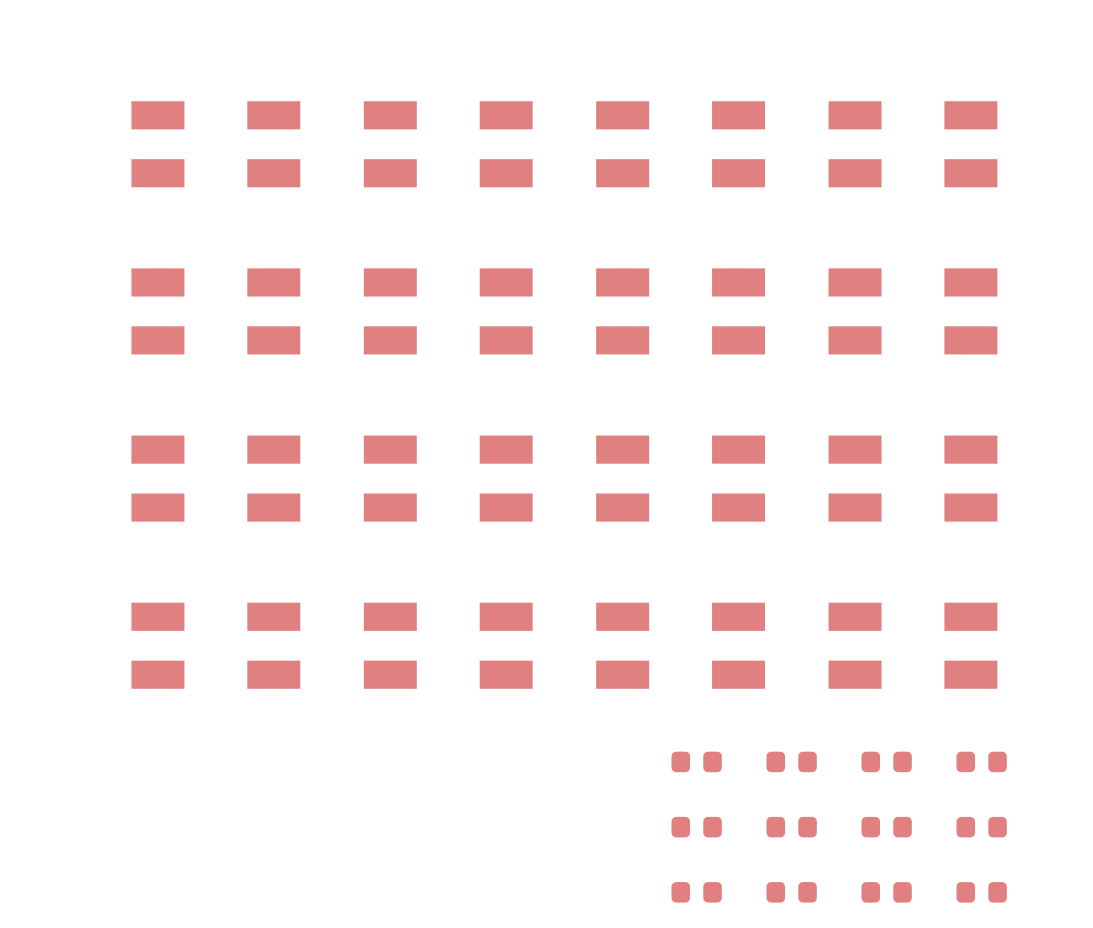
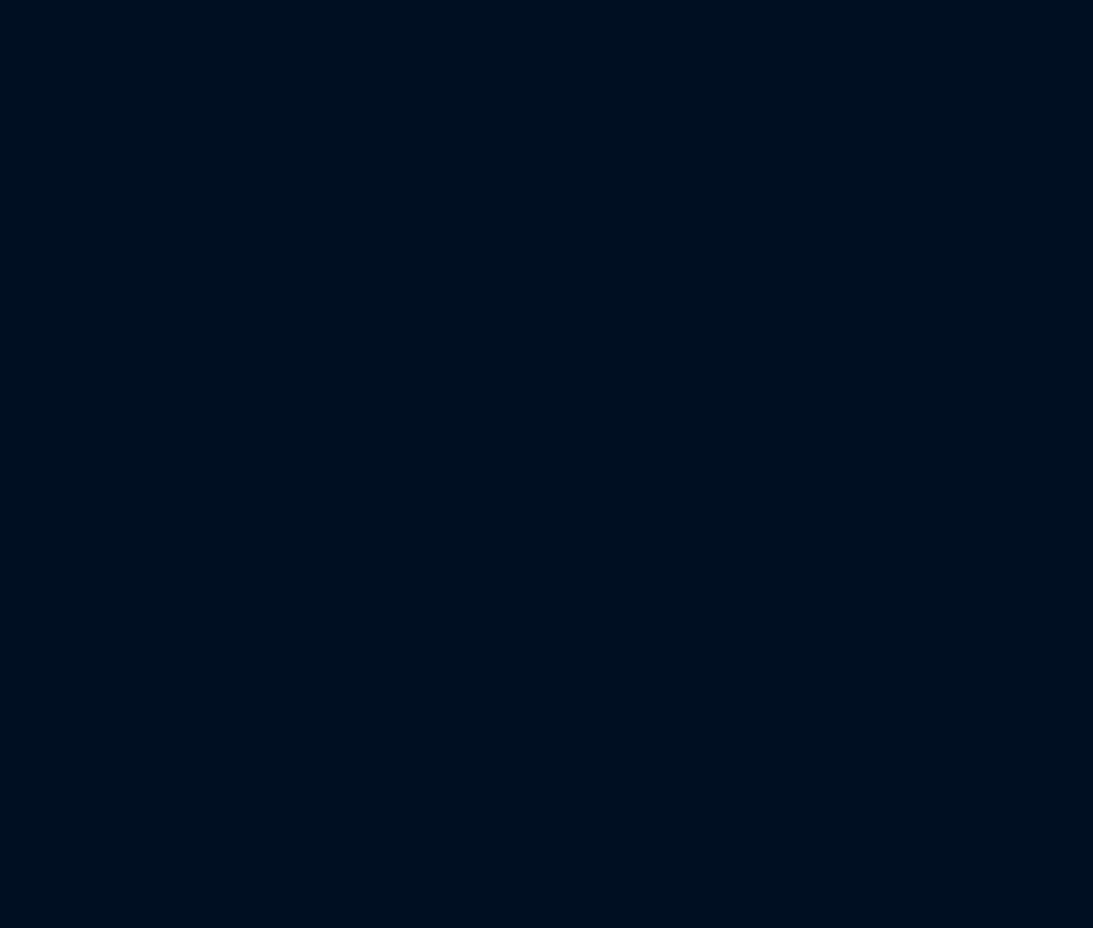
part: (215, 144) -> none
part: (448, 144) -> none
part: (680, 144) -> none
part: (912, 144) -> none
part: (215, 311) -> none
part: (448, 311) -> none
part: (680, 311) -> none
part: (912, 311) -> none
part: (215, 478) -> none
part: (448, 478) -> none
part: (680, 478) -> none
part: (912, 478) -> none
part: (215, 645) -> none
part: (448, 645) -> none
part: (680, 645) -> none
part: (912, 645) -> none
part: (696, 761) -> none
part: (791, 761) -> none
part: (886, 761) -> none
part: (981, 761) -> none
part: (696, 827) -> none
part: (791, 827) -> none
part: (886, 827) -> none
part: (981, 827) -> none
part: (696, 892) -> none
part: (791, 892) -> none
part: (886, 892) -> none
part: (981, 892) -> none

